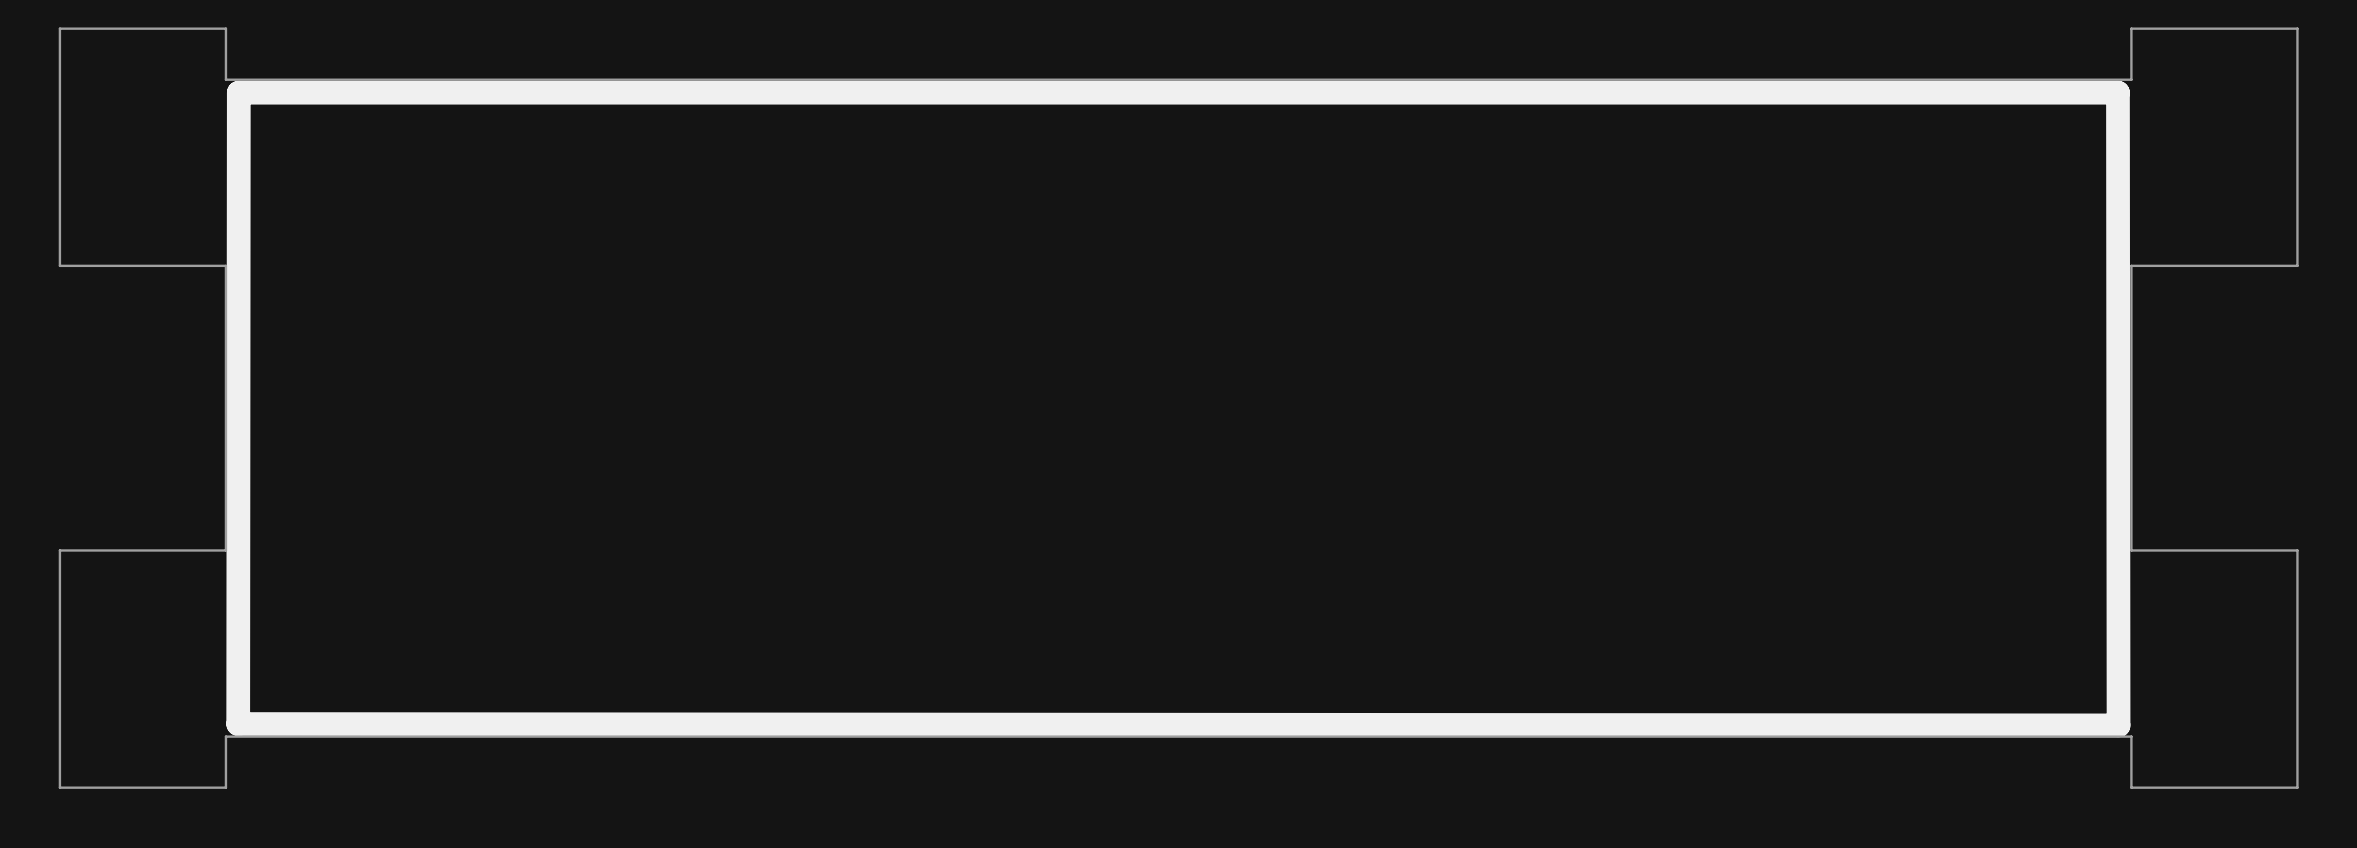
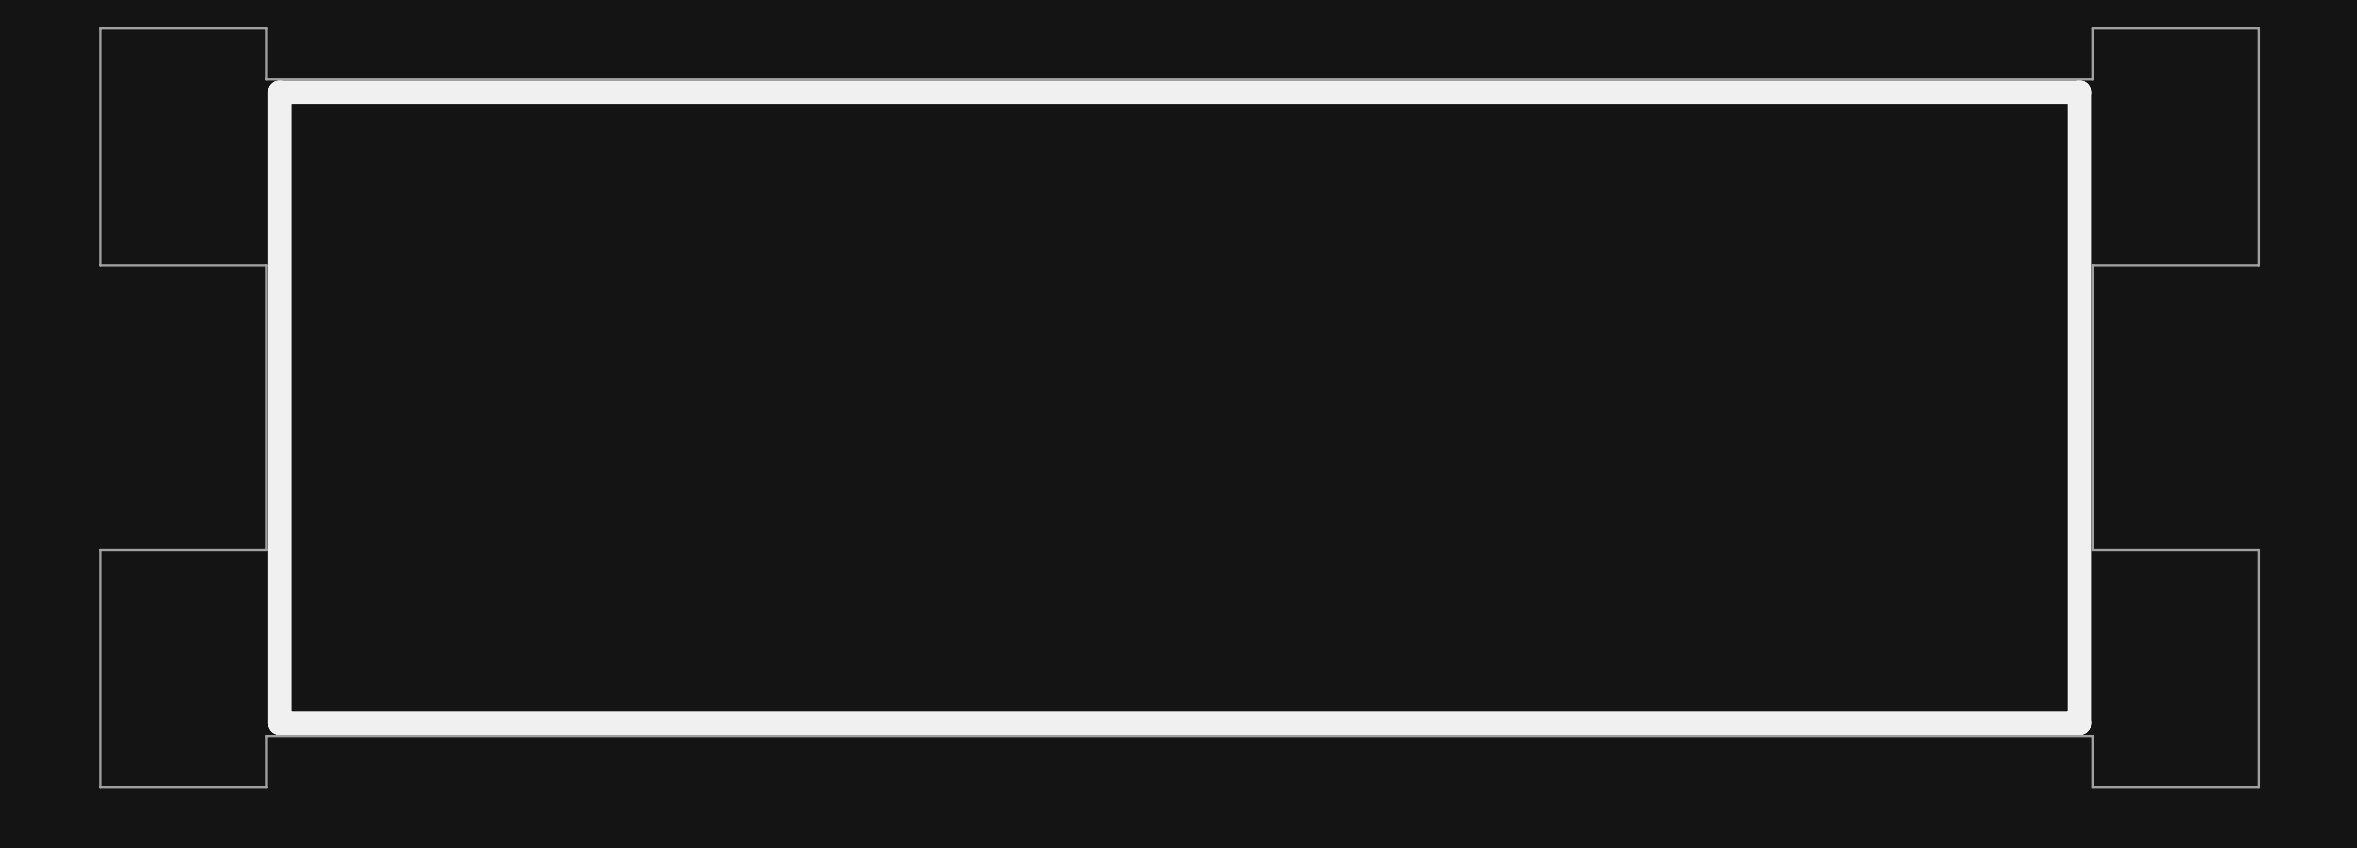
drawing shape: [58, 27, 2299, 789] -> [99, 26, 2261, 789]

